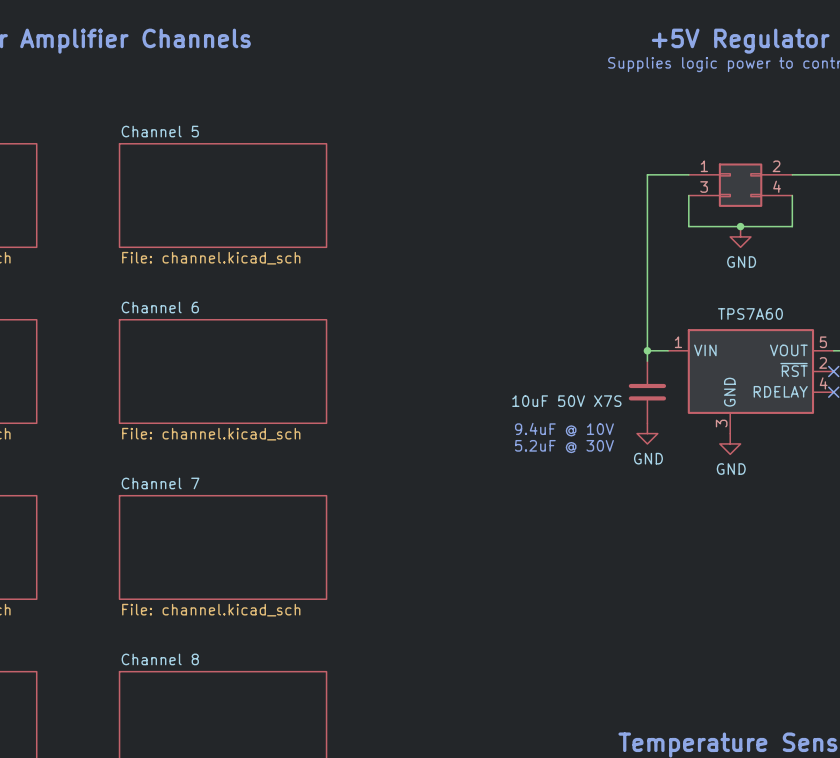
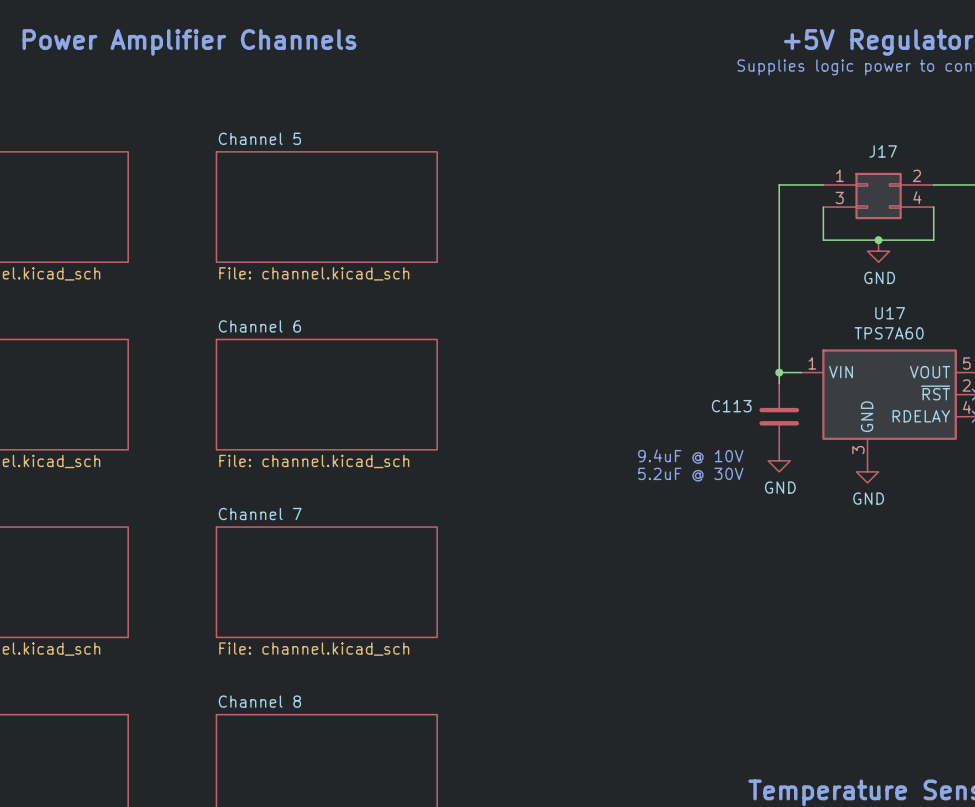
J17 name: none -> J17 (883, 151)
U17 name: none -> U17 (890, 313)
C113 name: none -> C113 (731, 406)
C113 value: 10uF 50V X7S (566, 401) -> none

